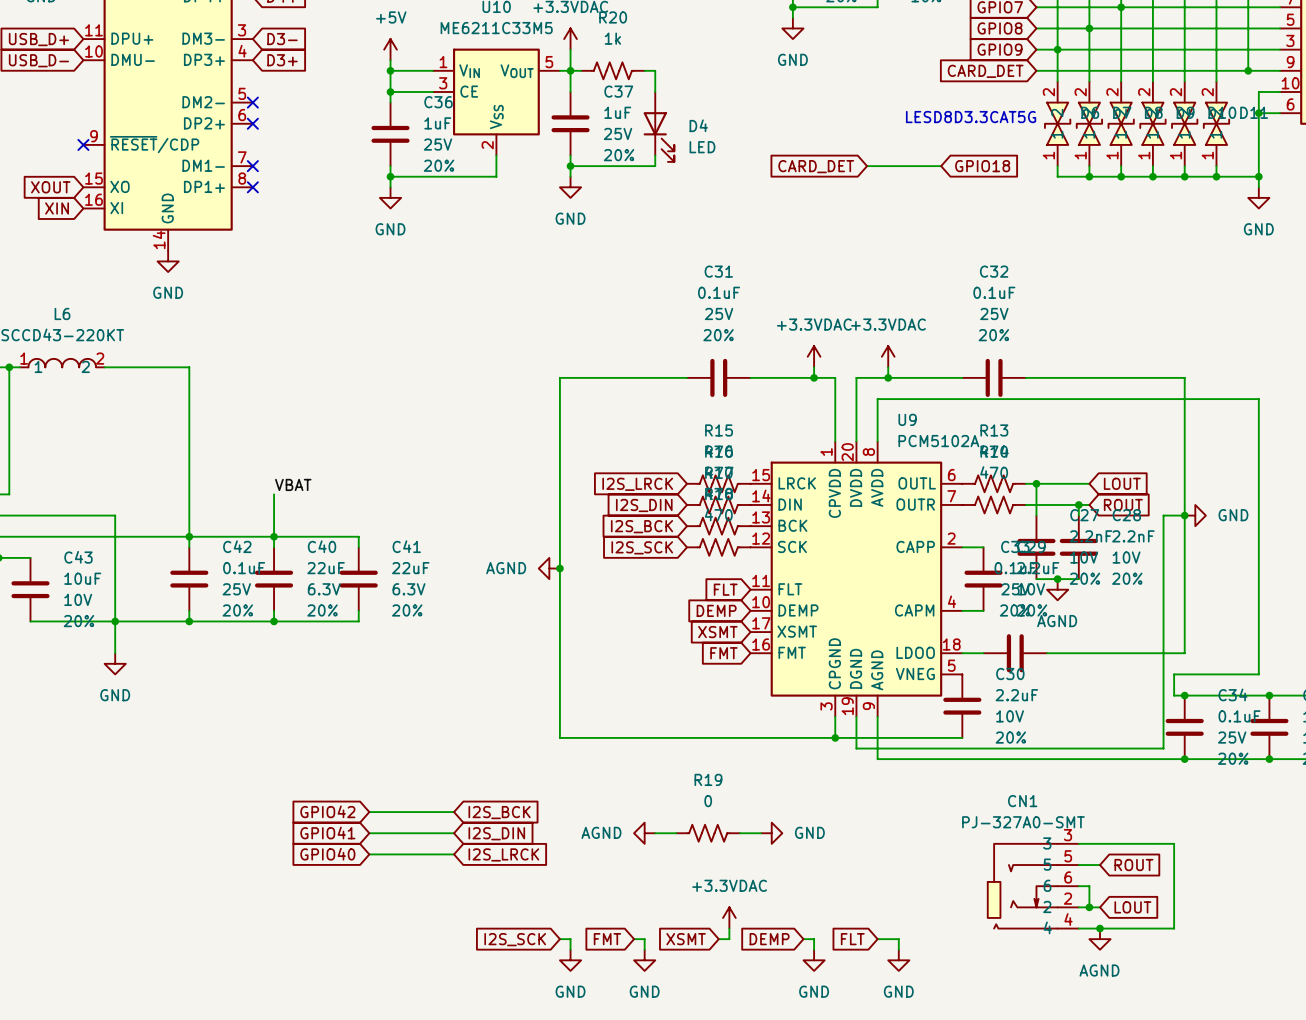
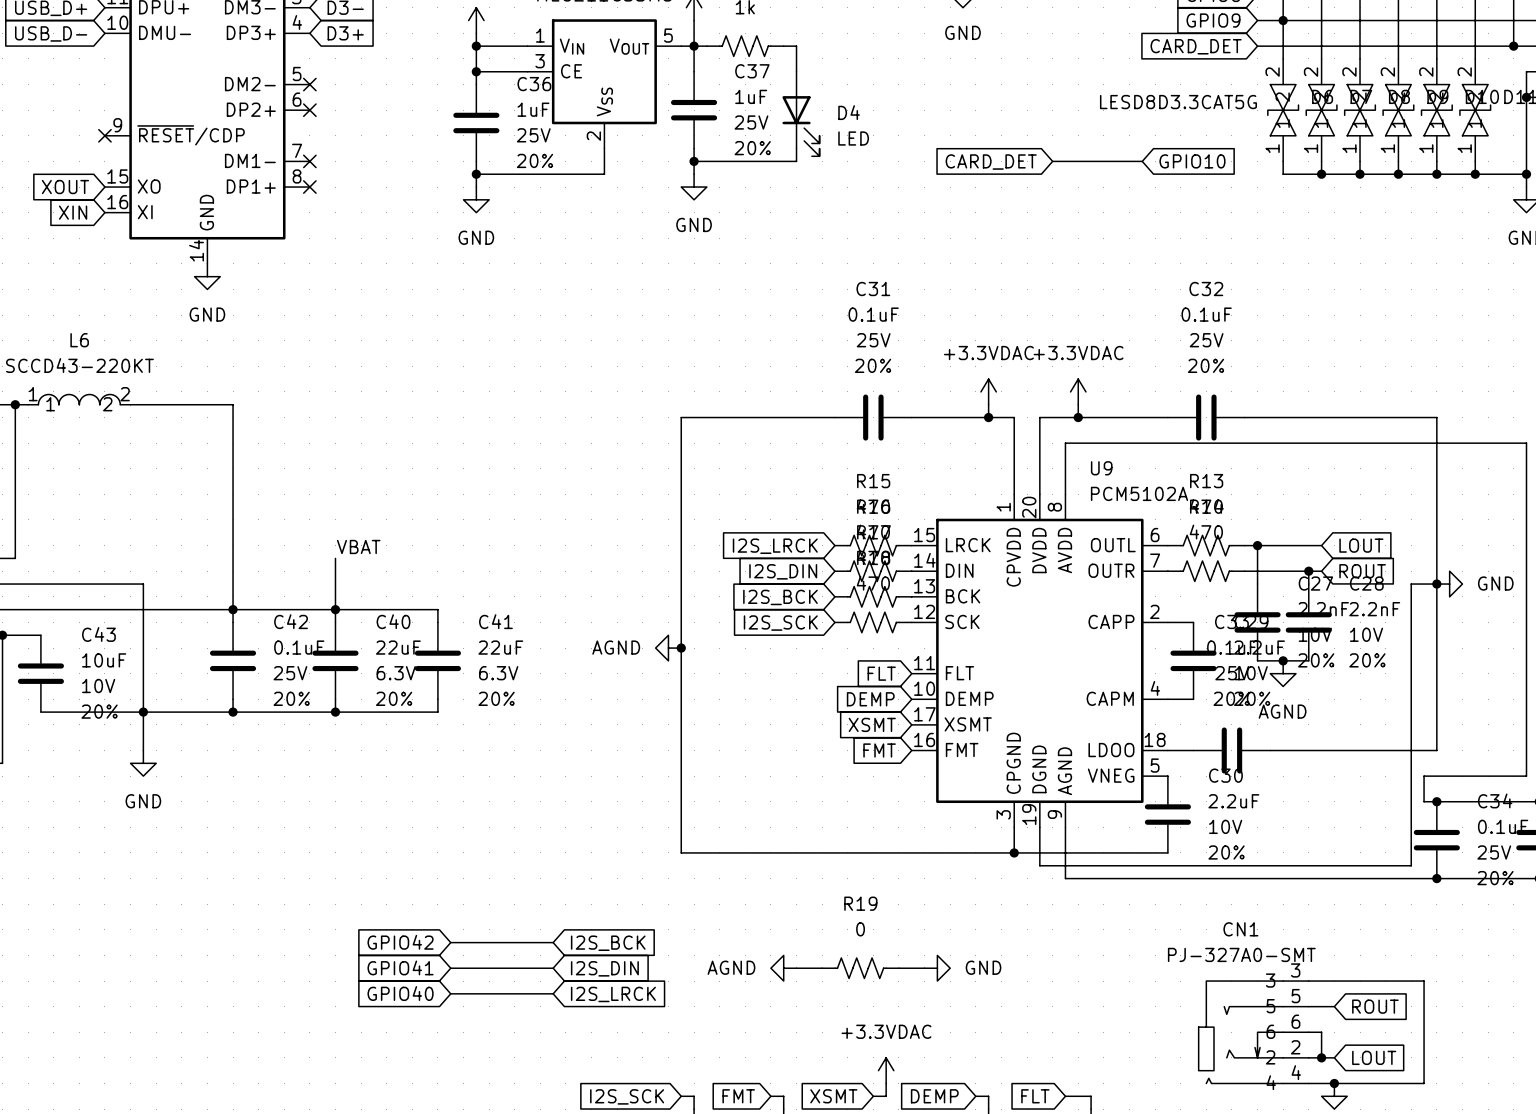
global label: GPIO18 (982, 166) -> GPIO10 (1192, 161)

